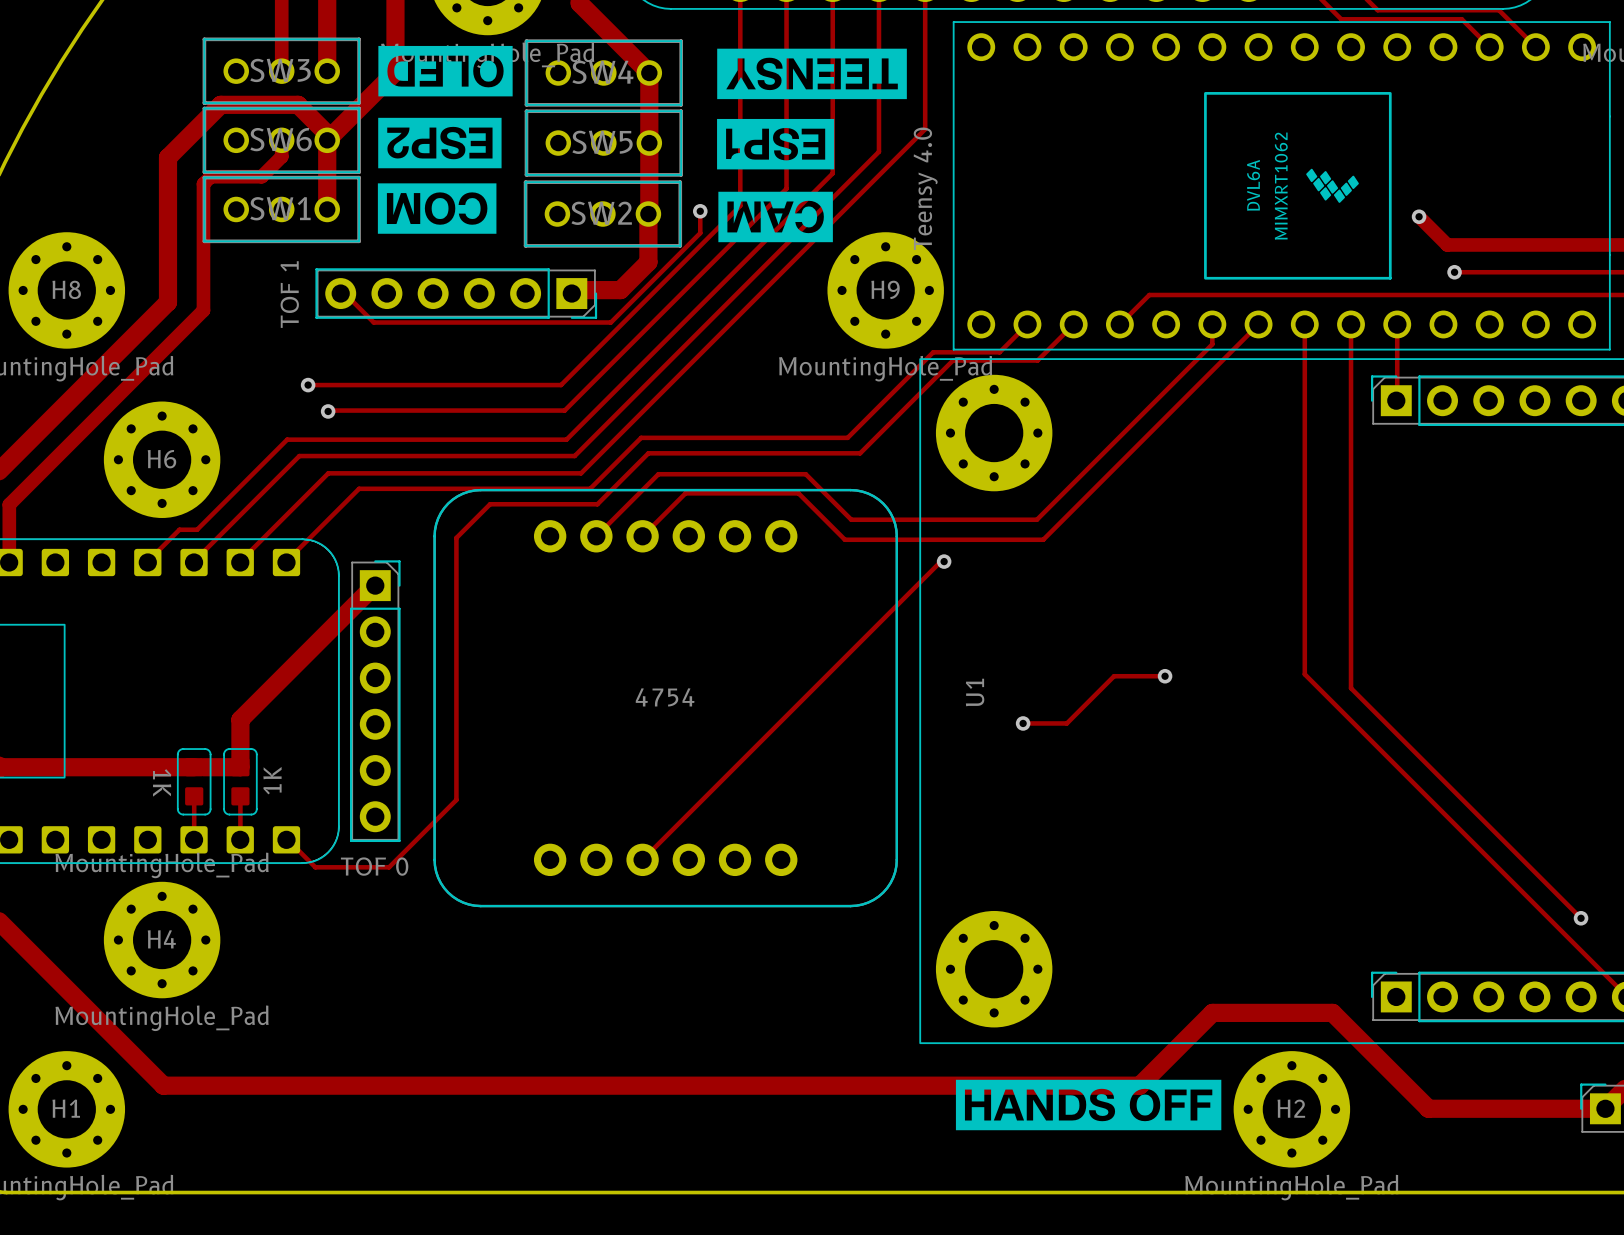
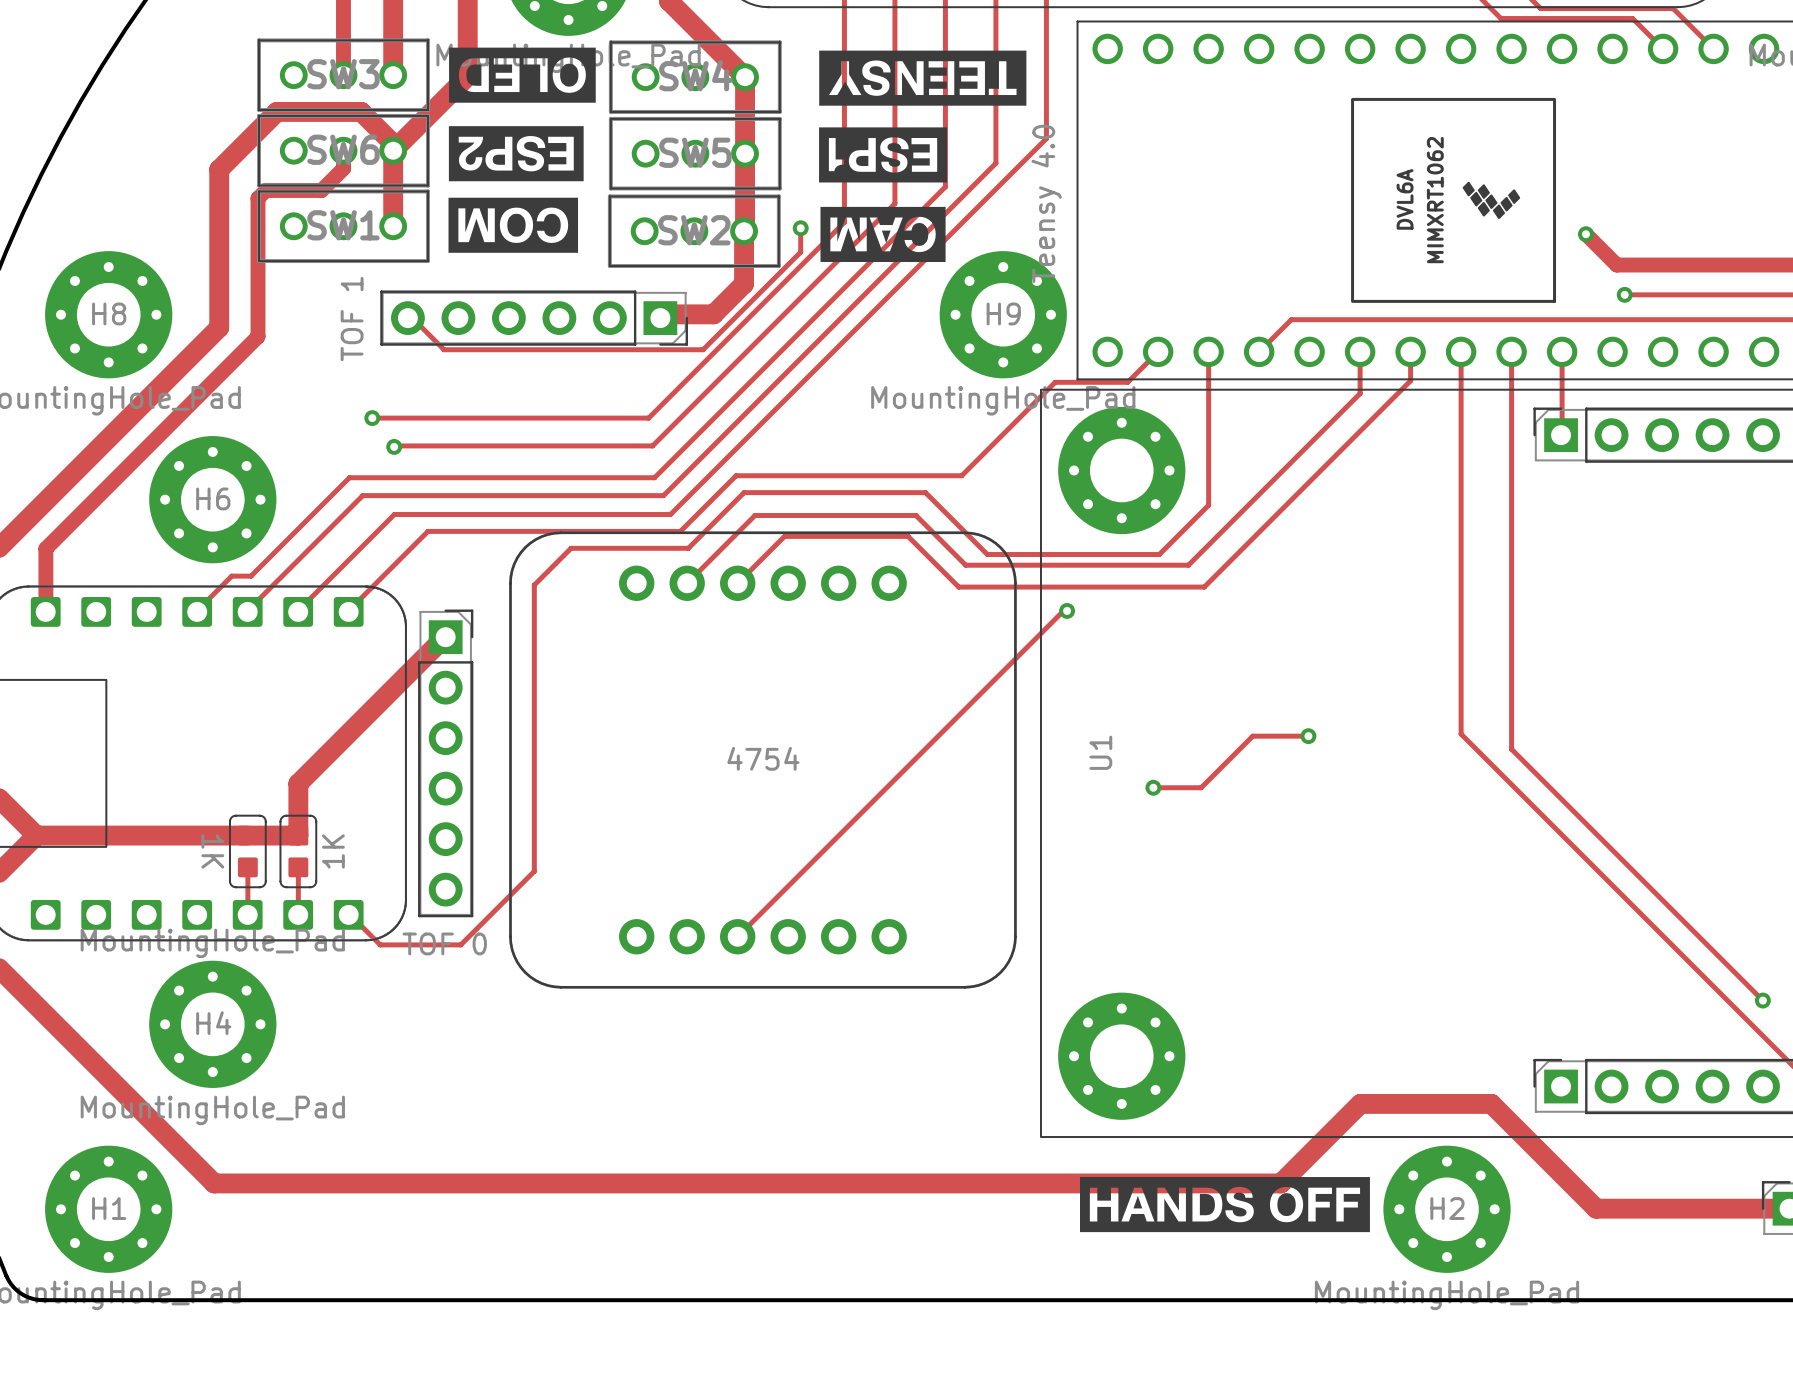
track: (1073, 324) (1037, 360) (952, 360) (860, 453) (814, 453) -> (1208, 351) (1208, 505) (1159, 554) (987, 554) (925, 492)
track: (1258, 324) (1043, 539) -> (1410, 351) (1410, 380) (1204, 587) (1175, 587)
track: (1212, 344) (1036, 519) -> (1360, 373) (1360, 393) (1188, 565) (1168, 565)

